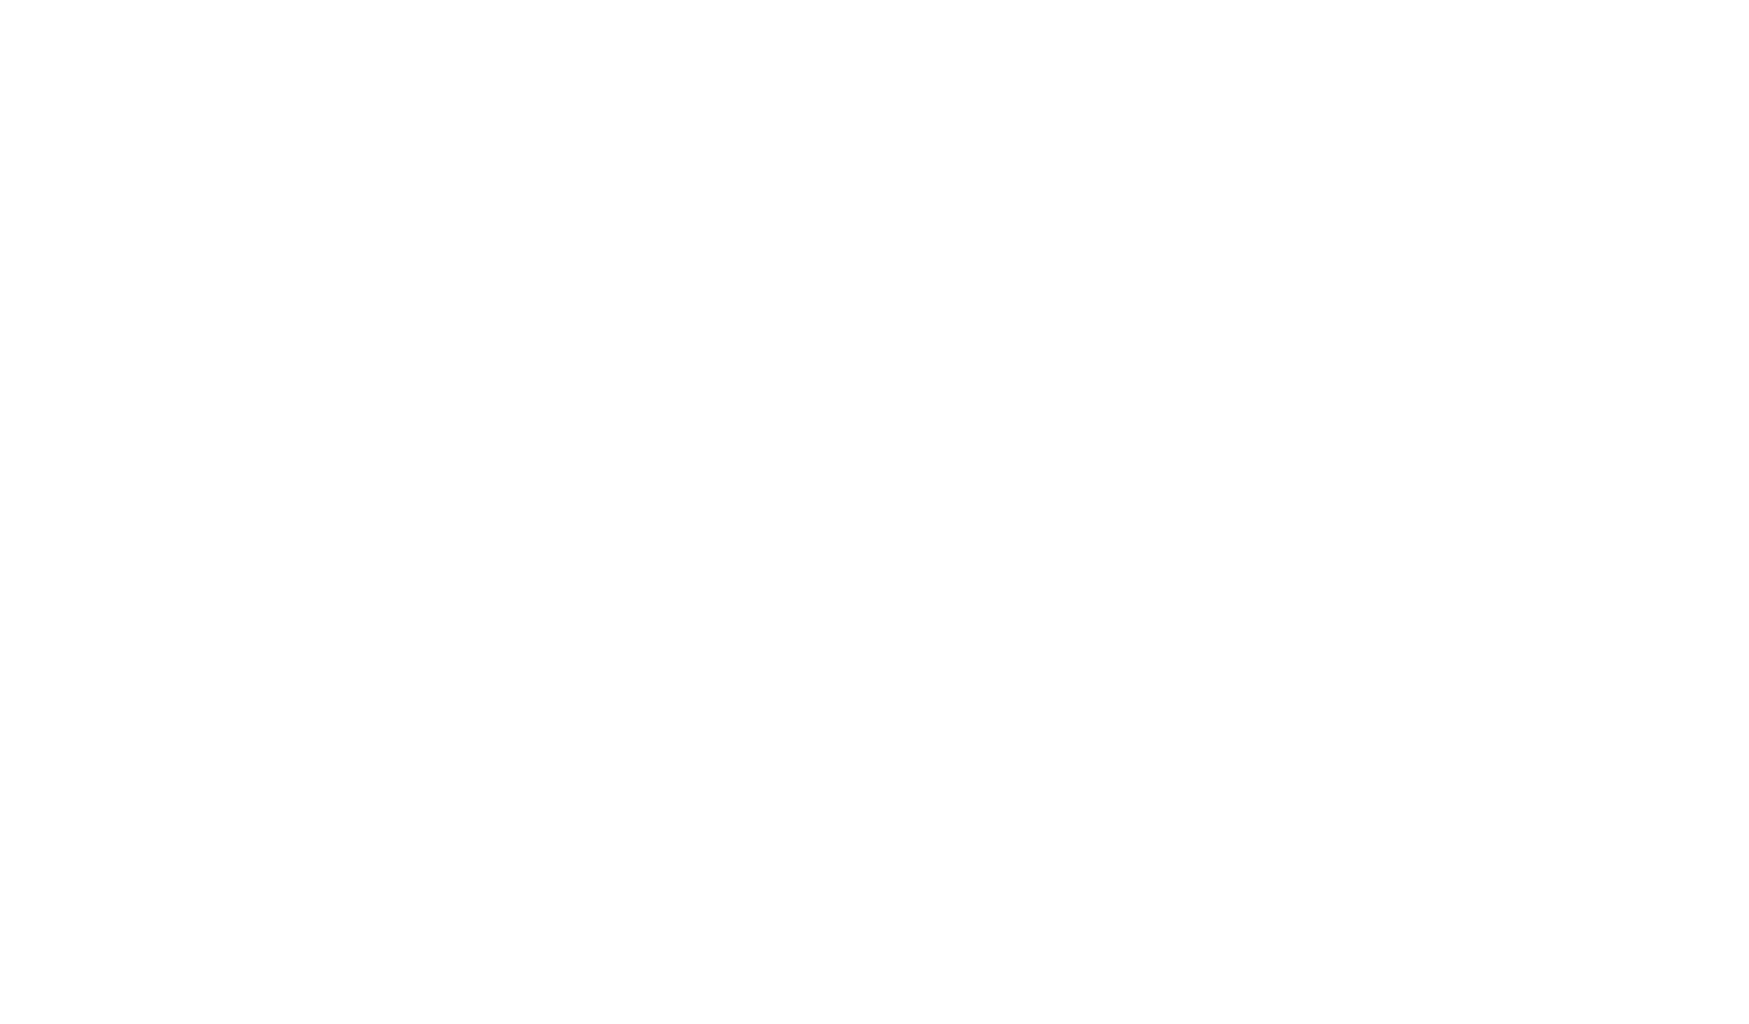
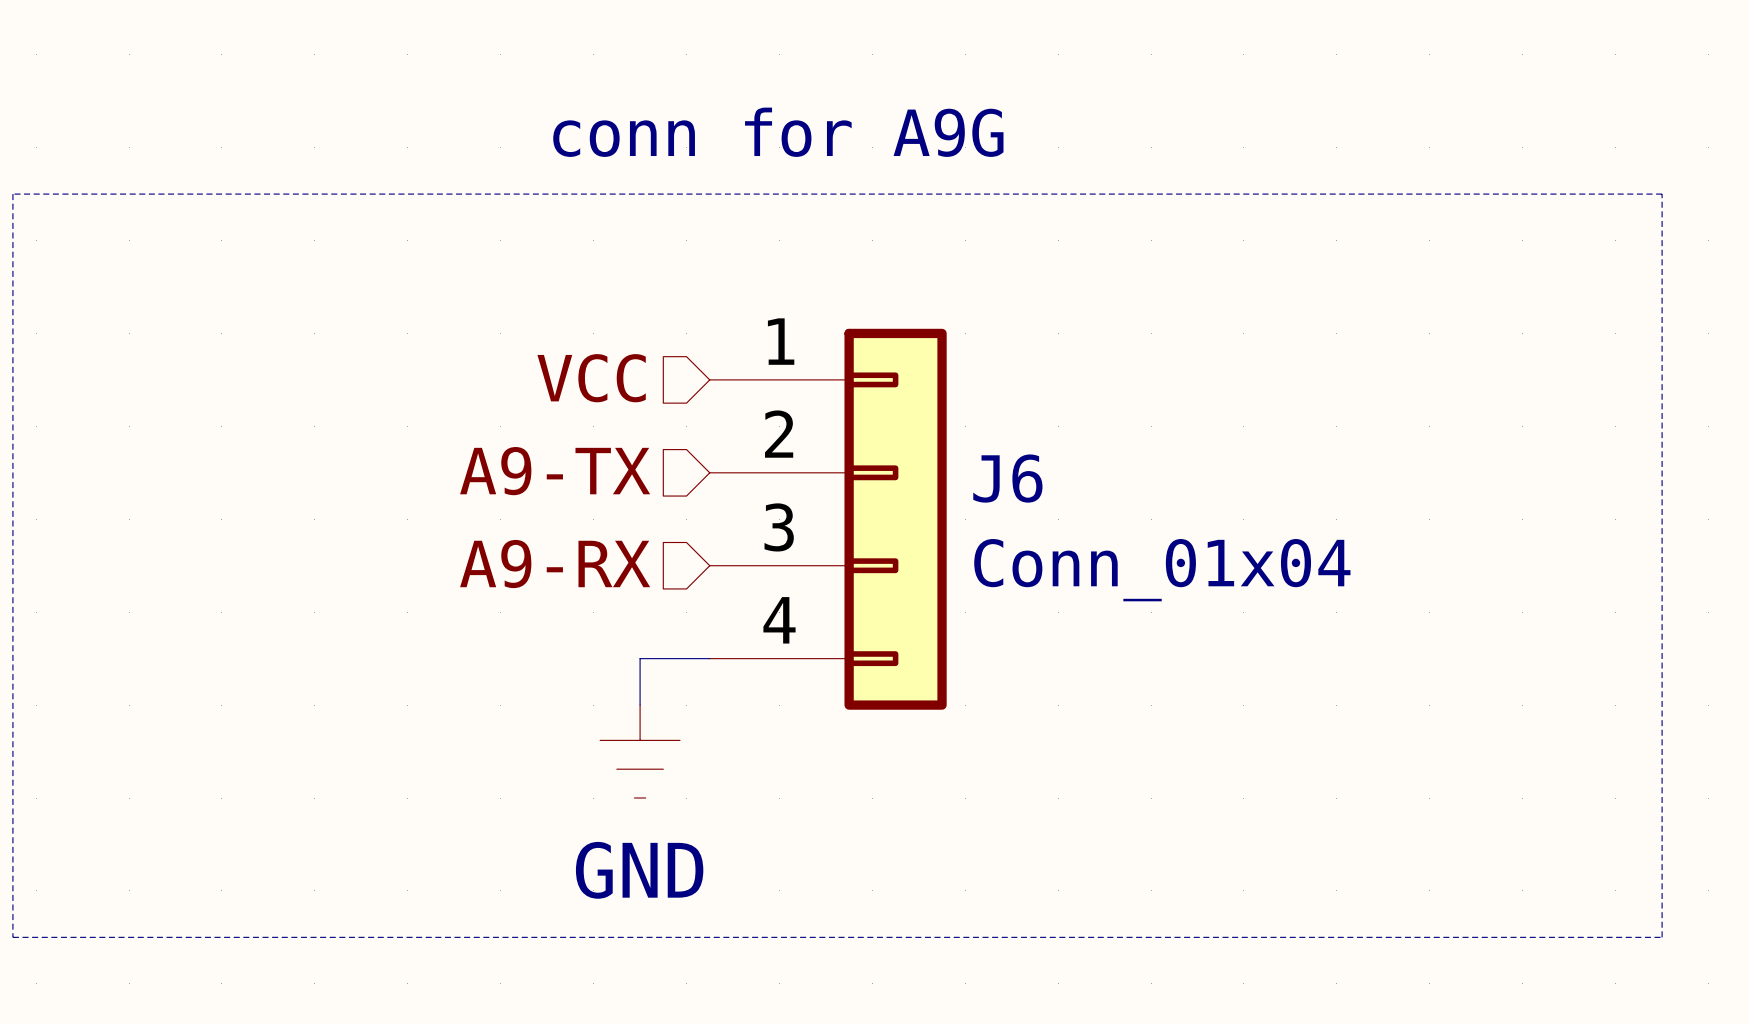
text: none -> conn for A9G (778, 132)
line: none -> (12, 194) (1662, 194) (1662, 937) (12, 937) (12, 194)
hierarchical label: none -> VCC (591, 378)
hierarchical label: none -> A9-TX (555, 471)
J6: none -> Conn_01x04 (828, 519)
hierarchical label: none -> A9-RX (555, 564)
wire: none -> (709, 658) (640, 658) (640, 705)
power symbol: none -> GND (640, 751)

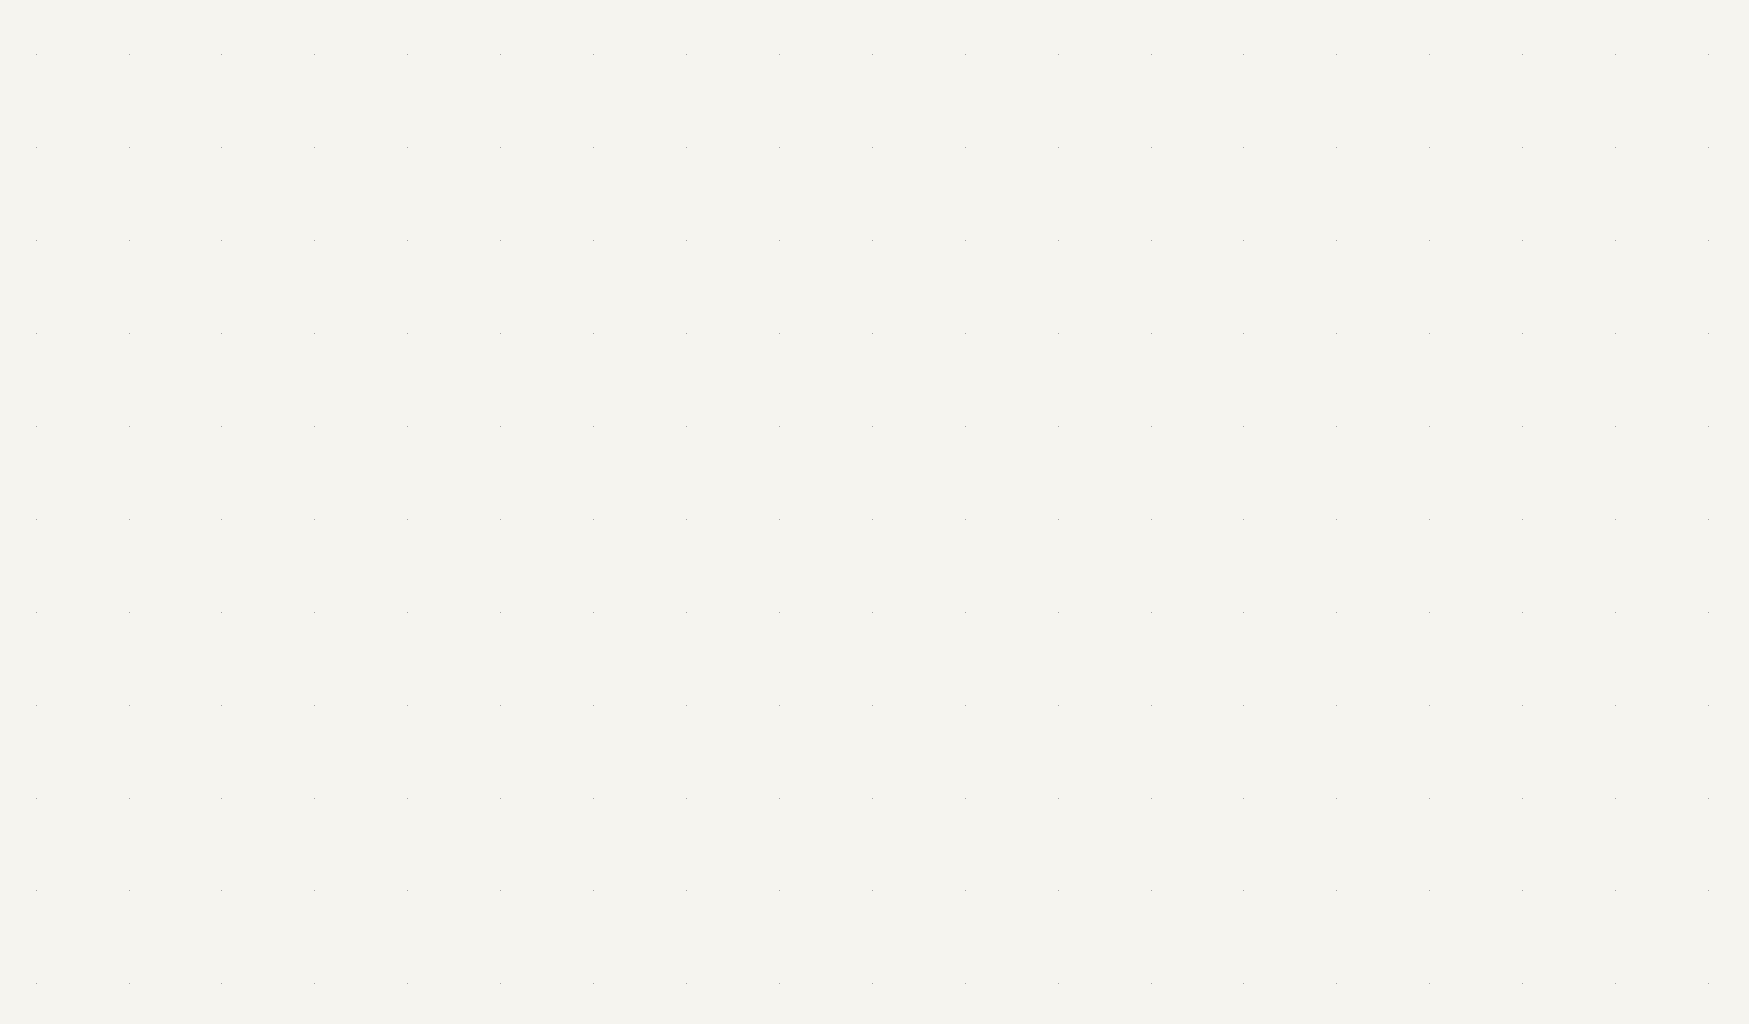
text: conn for A9G (778, 132) -> none
line: (12, 194) (1662, 194) (1662, 937) (12, 937) (12, 194) -> none
hierarchical label: VCC (591, 378) -> none
hierarchical label: A9-TX (555, 471) -> none
J6: Conn_01x04 (828, 519) -> none
hierarchical label: A9-RX (555, 564) -> none
wire: (709, 658) (640, 658) (640, 705) -> none
power symbol: GND (640, 751) -> none

